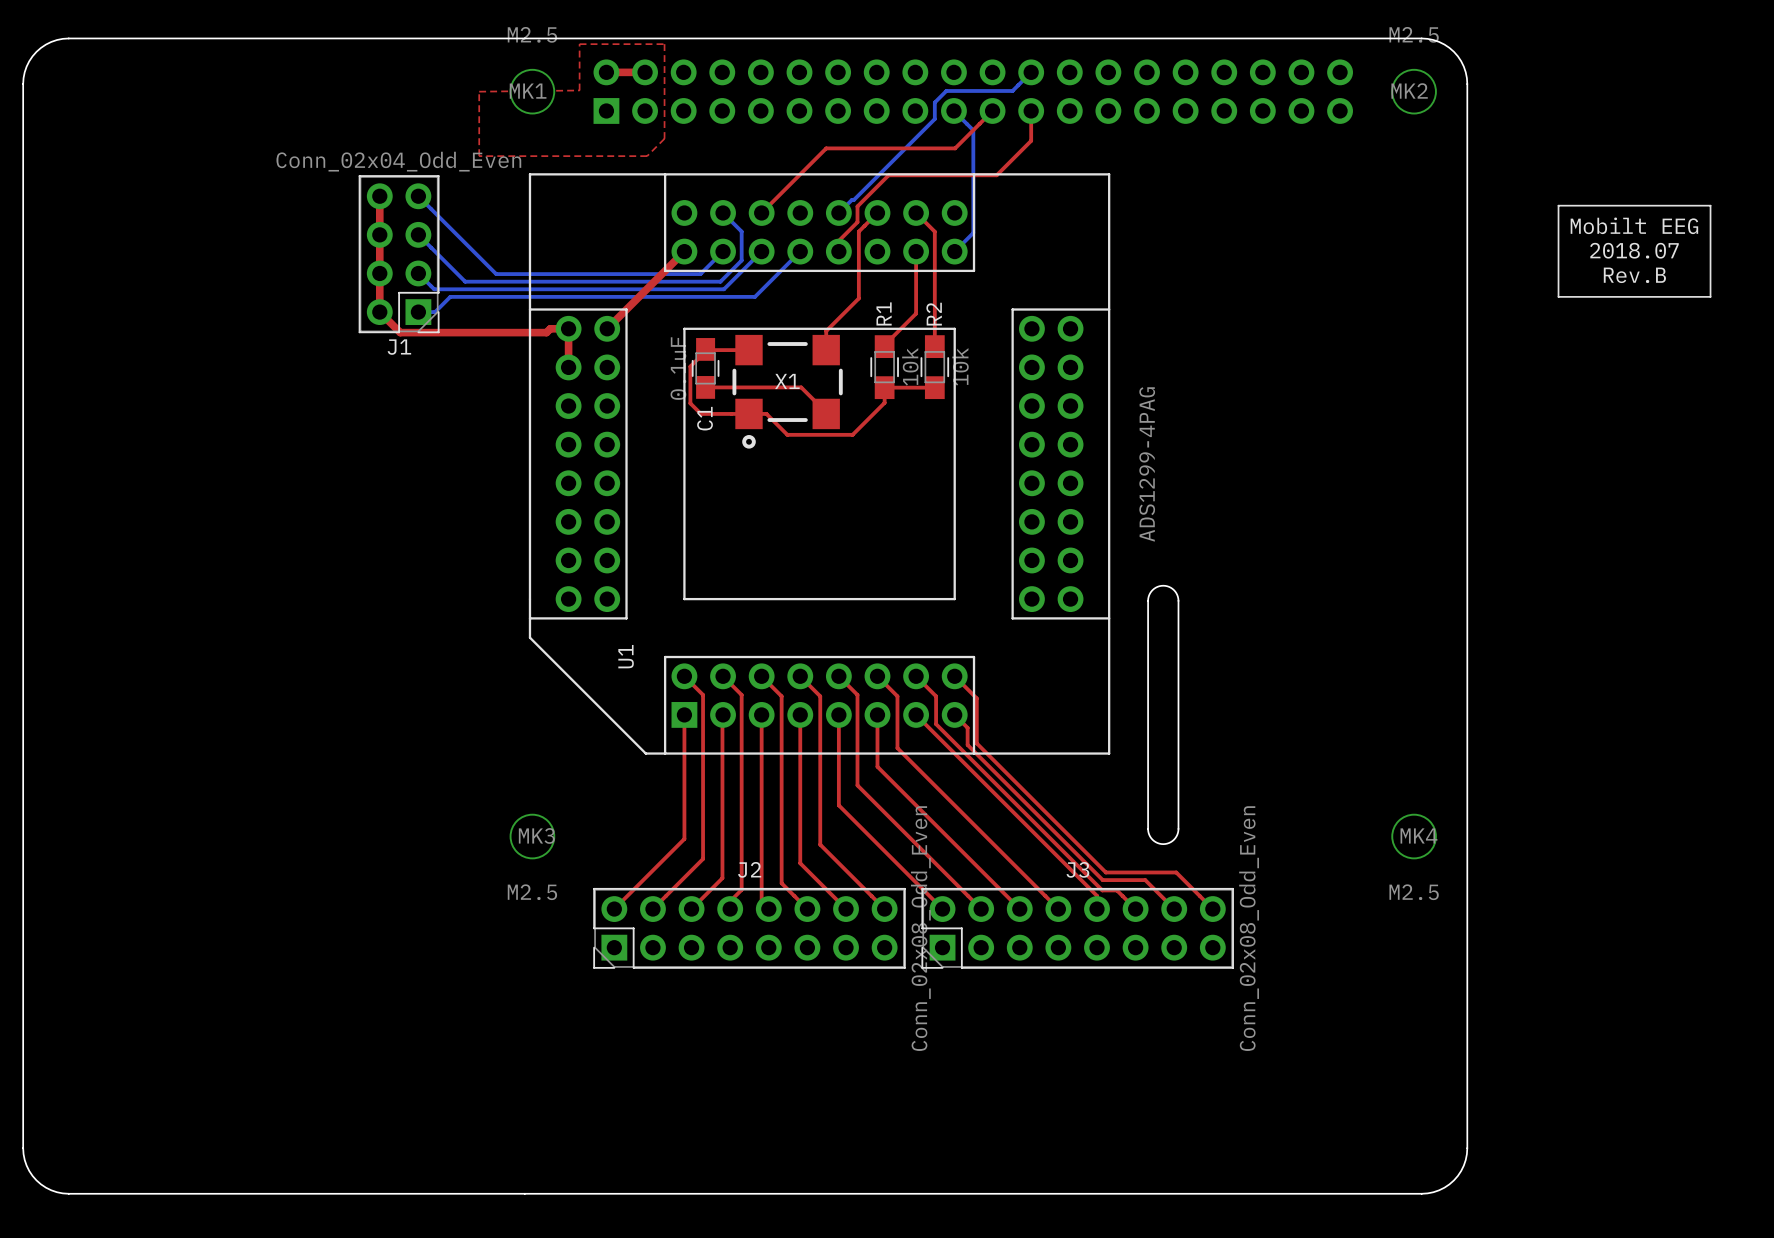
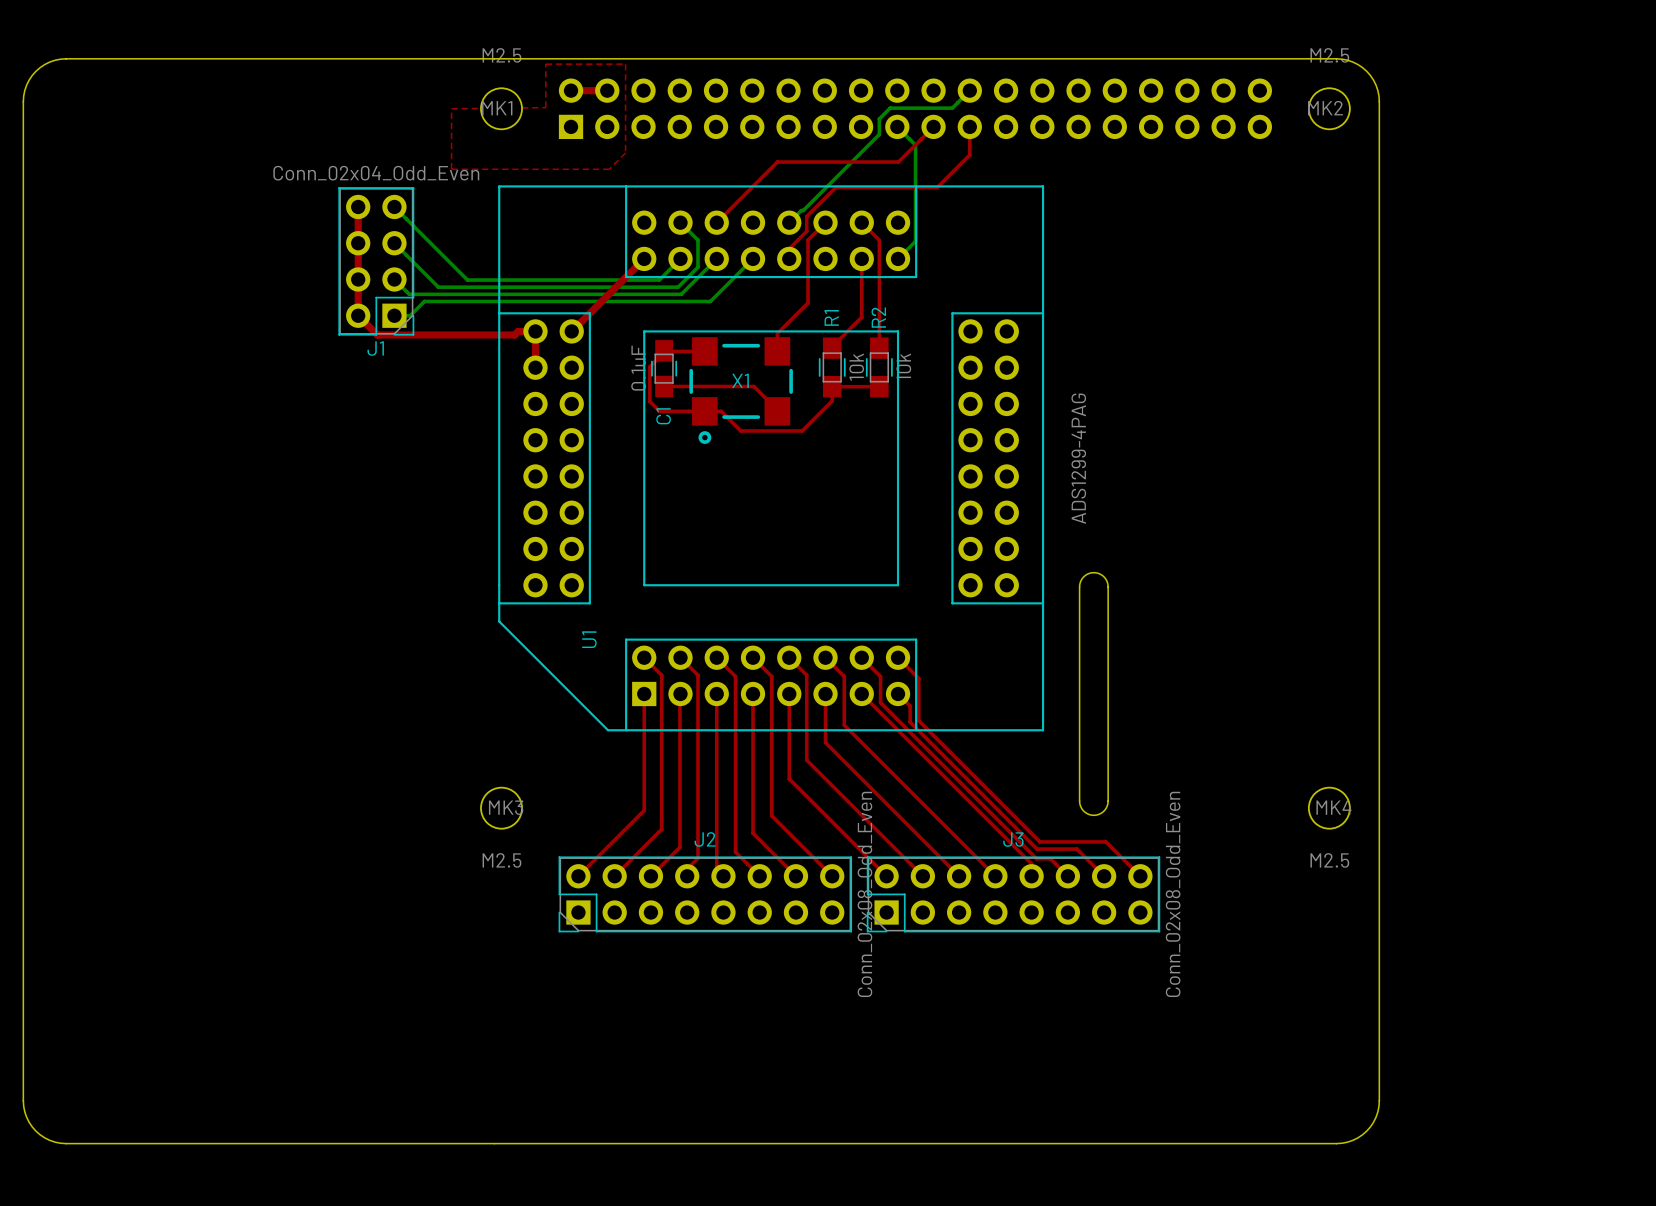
line: (1558, 205) (1558, 296) (1710, 296) (1710, 205) (1558, 205) -> none
text: Mobilt EEG (1634, 225) -> none
text: 2018.07 (1634, 250) -> none
text: Rev.B (1634, 275) -> none

